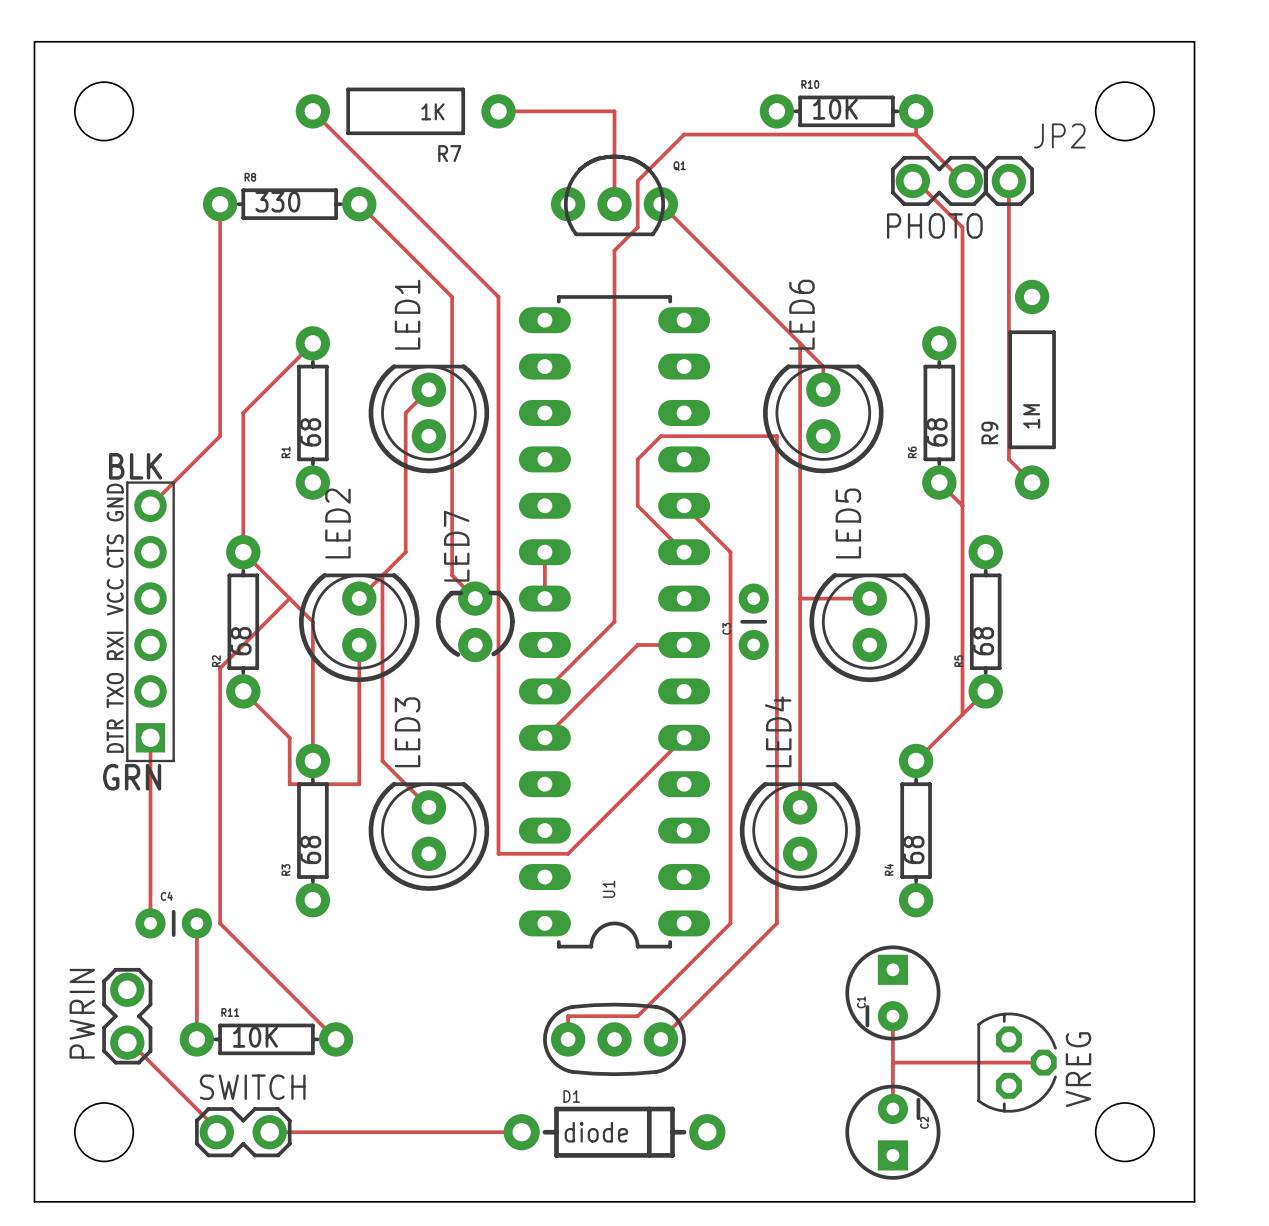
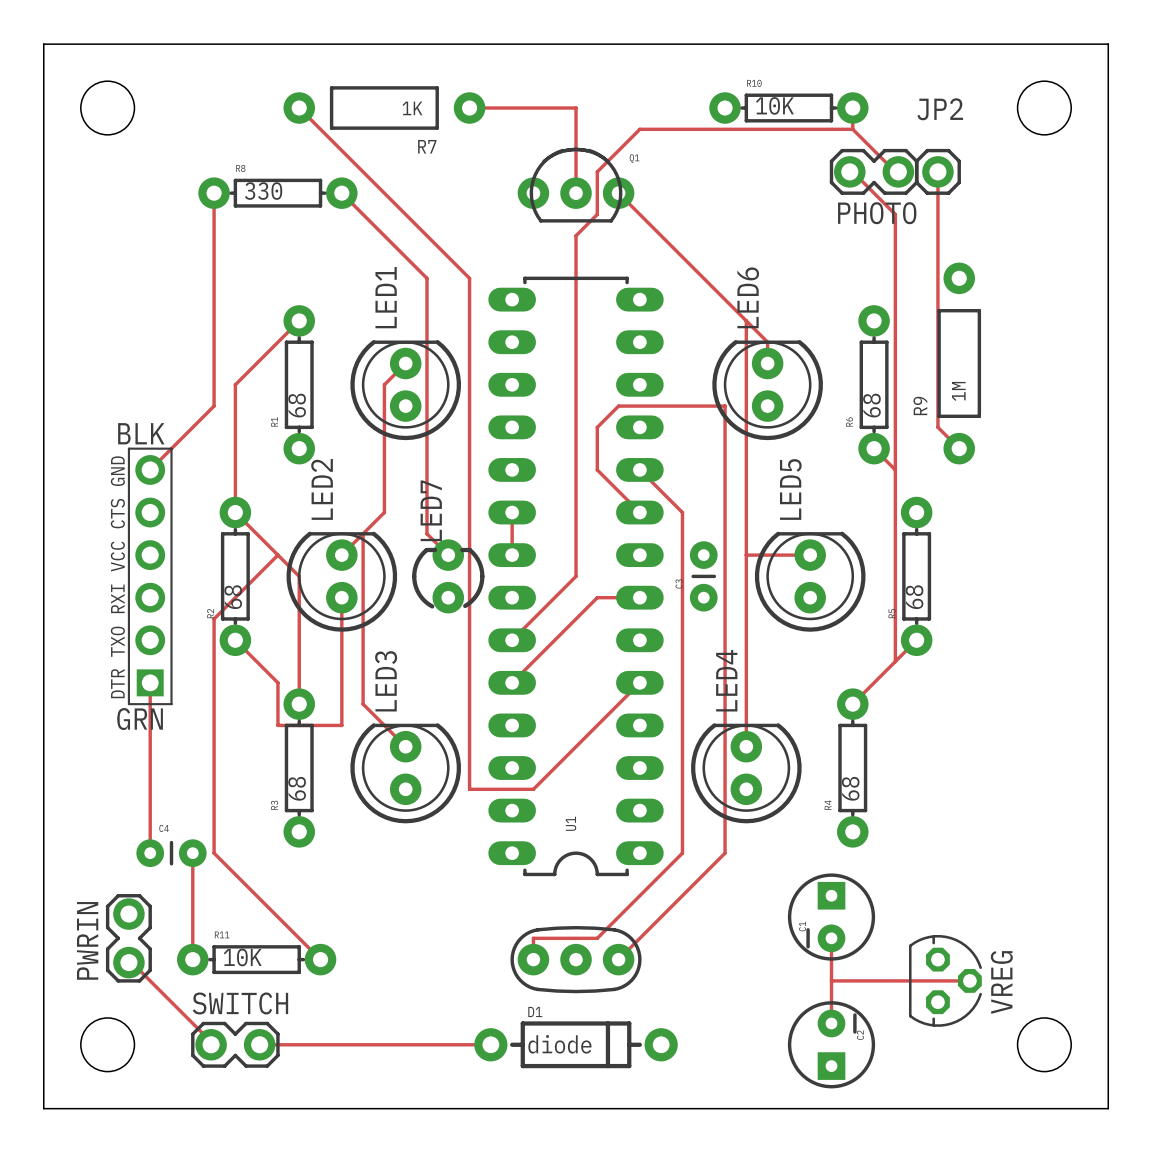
JP2 name position: JP2 (1059, 135) -> JP2 (940, 109)

